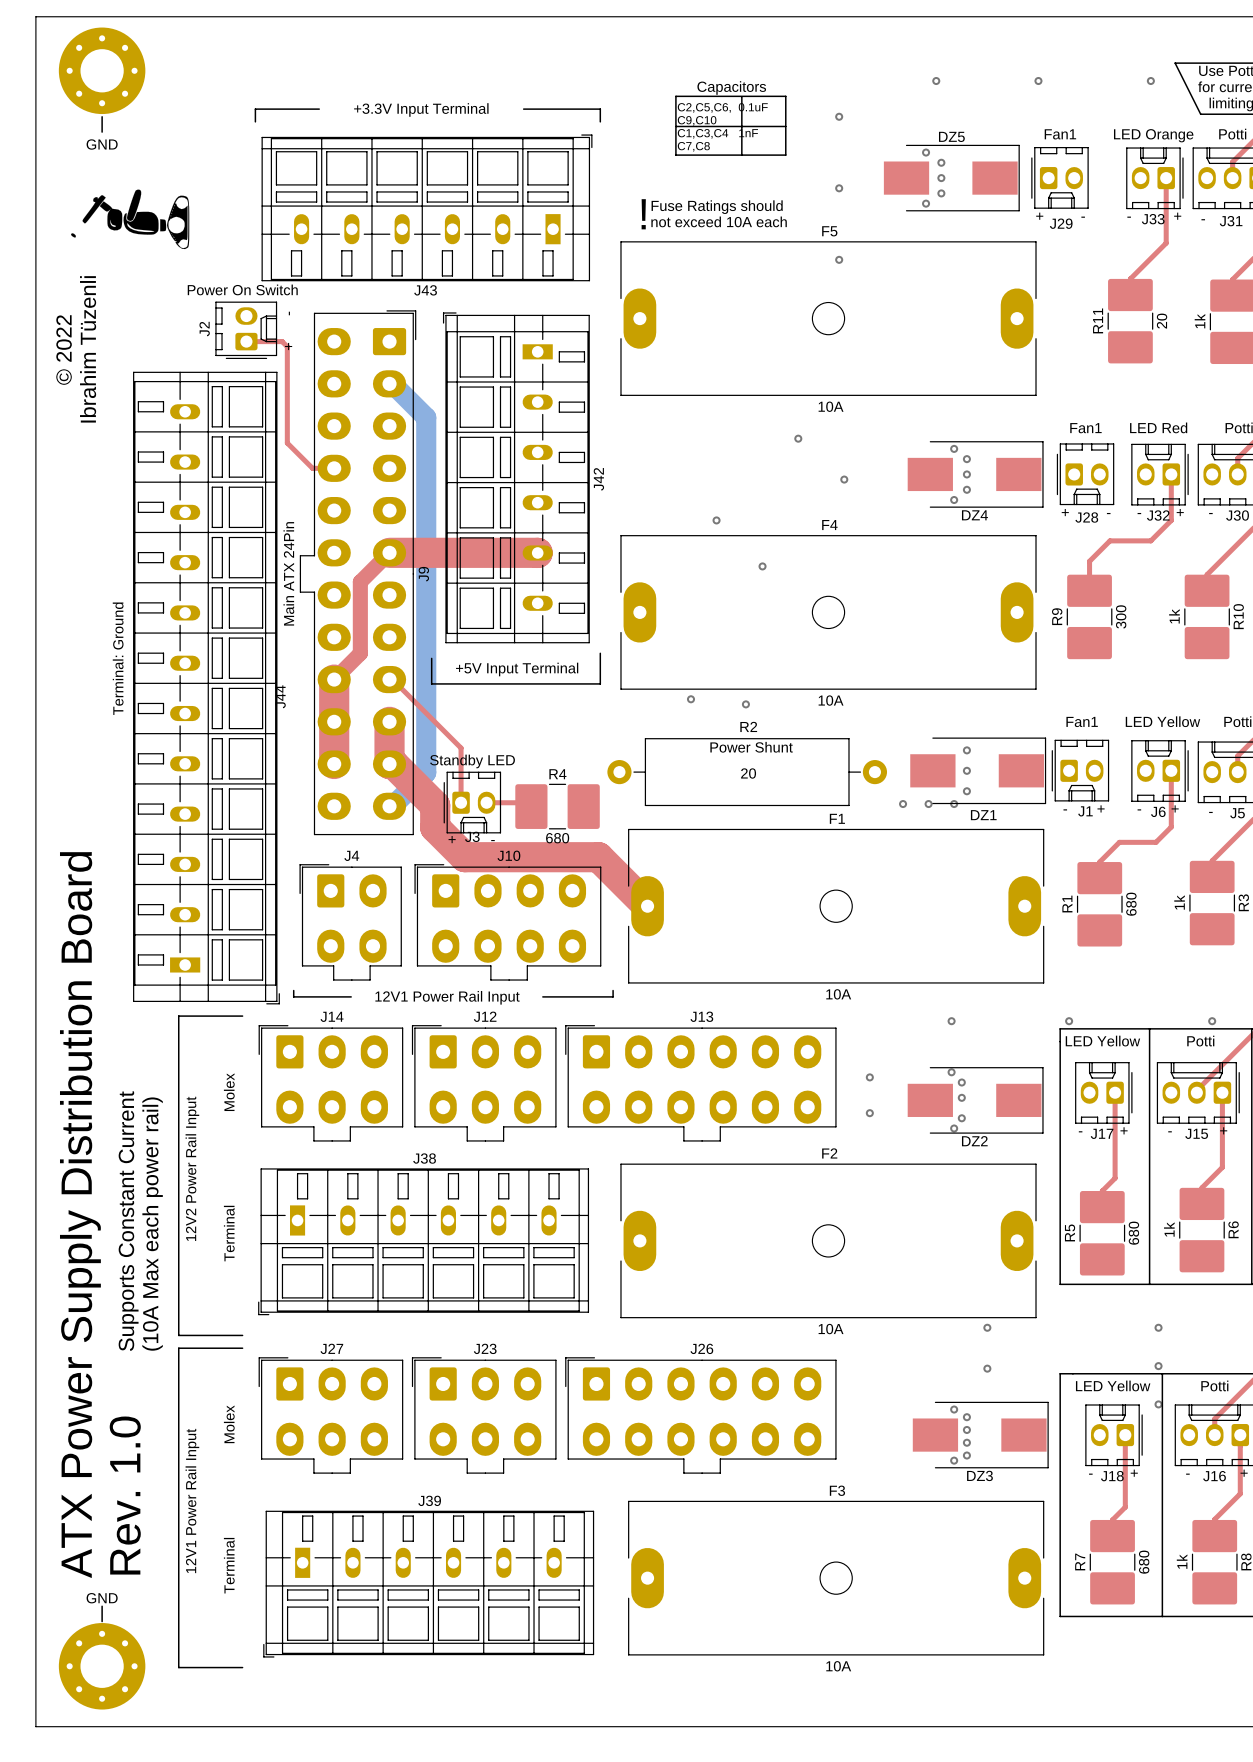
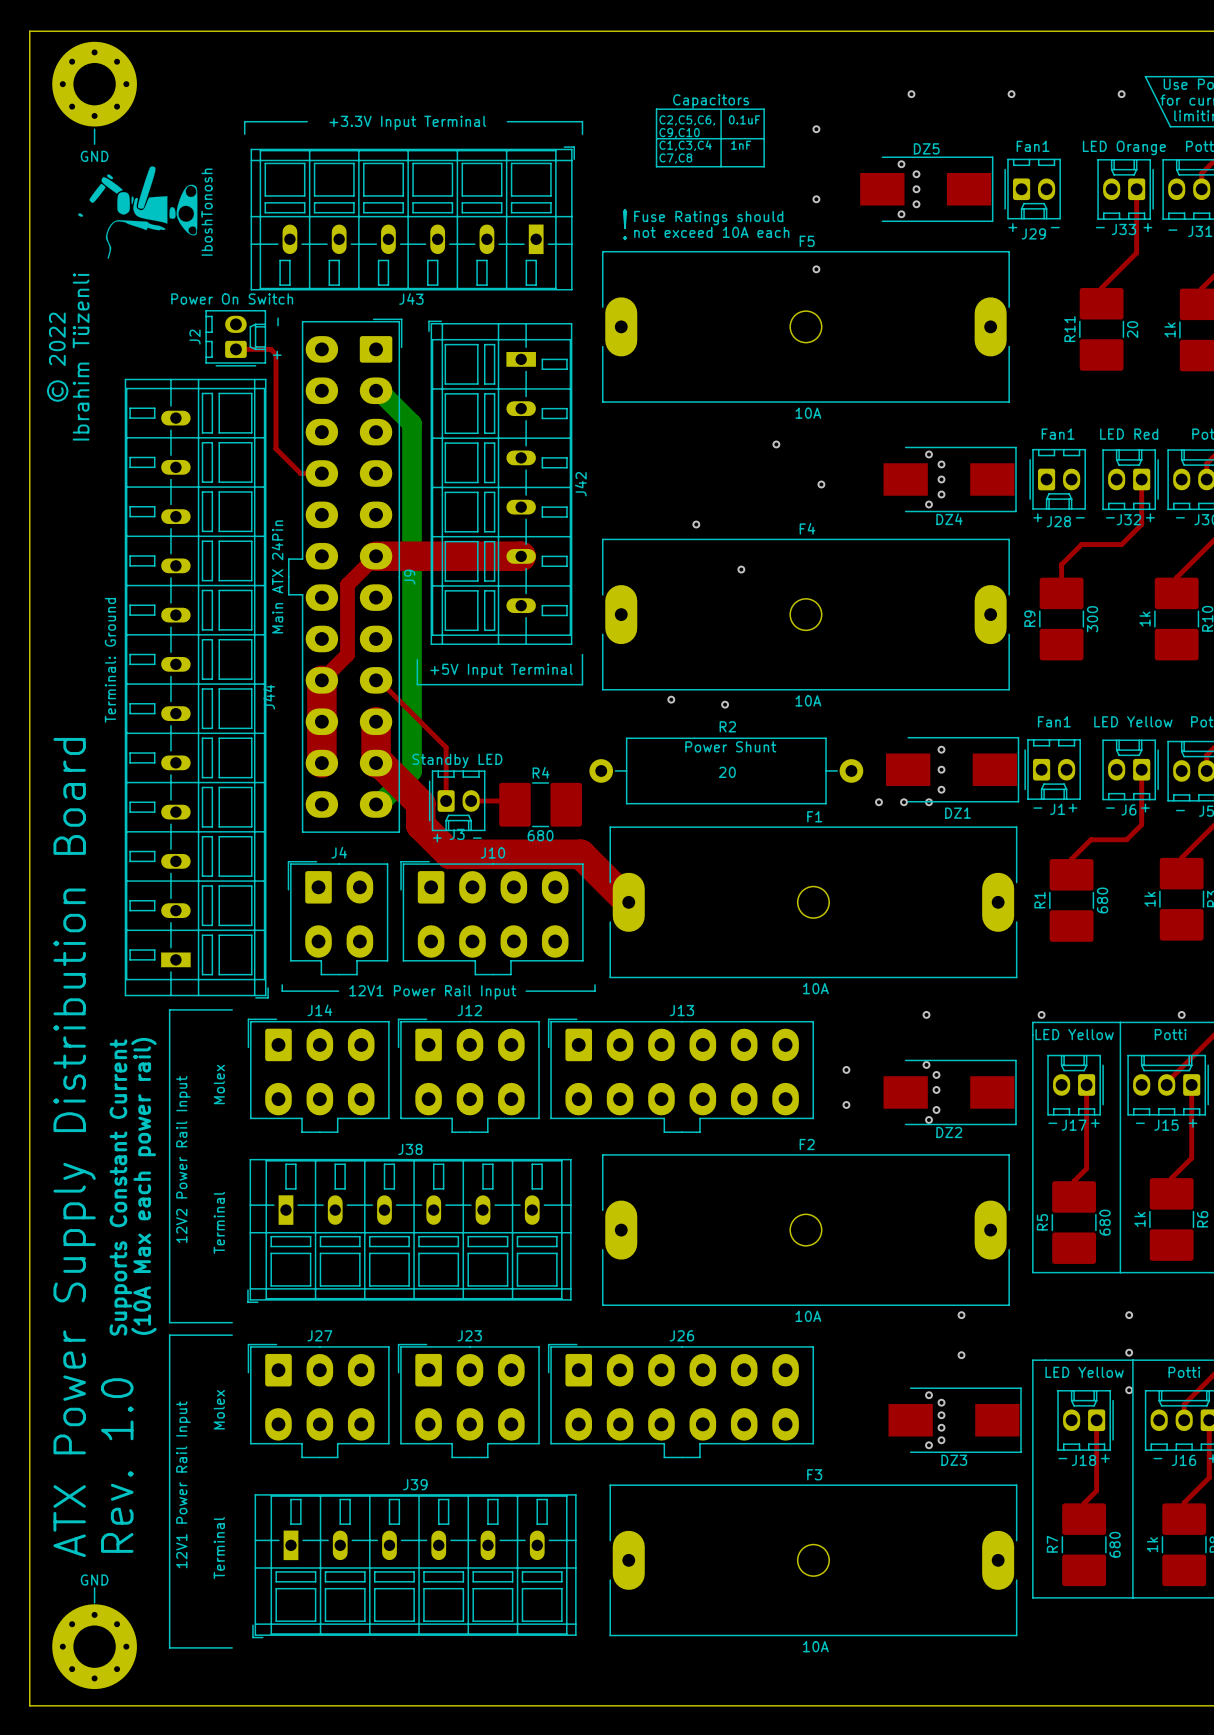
drawing: none -> [78, 166, 198, 259]
drawing: [71, 189, 190, 250] -> none

